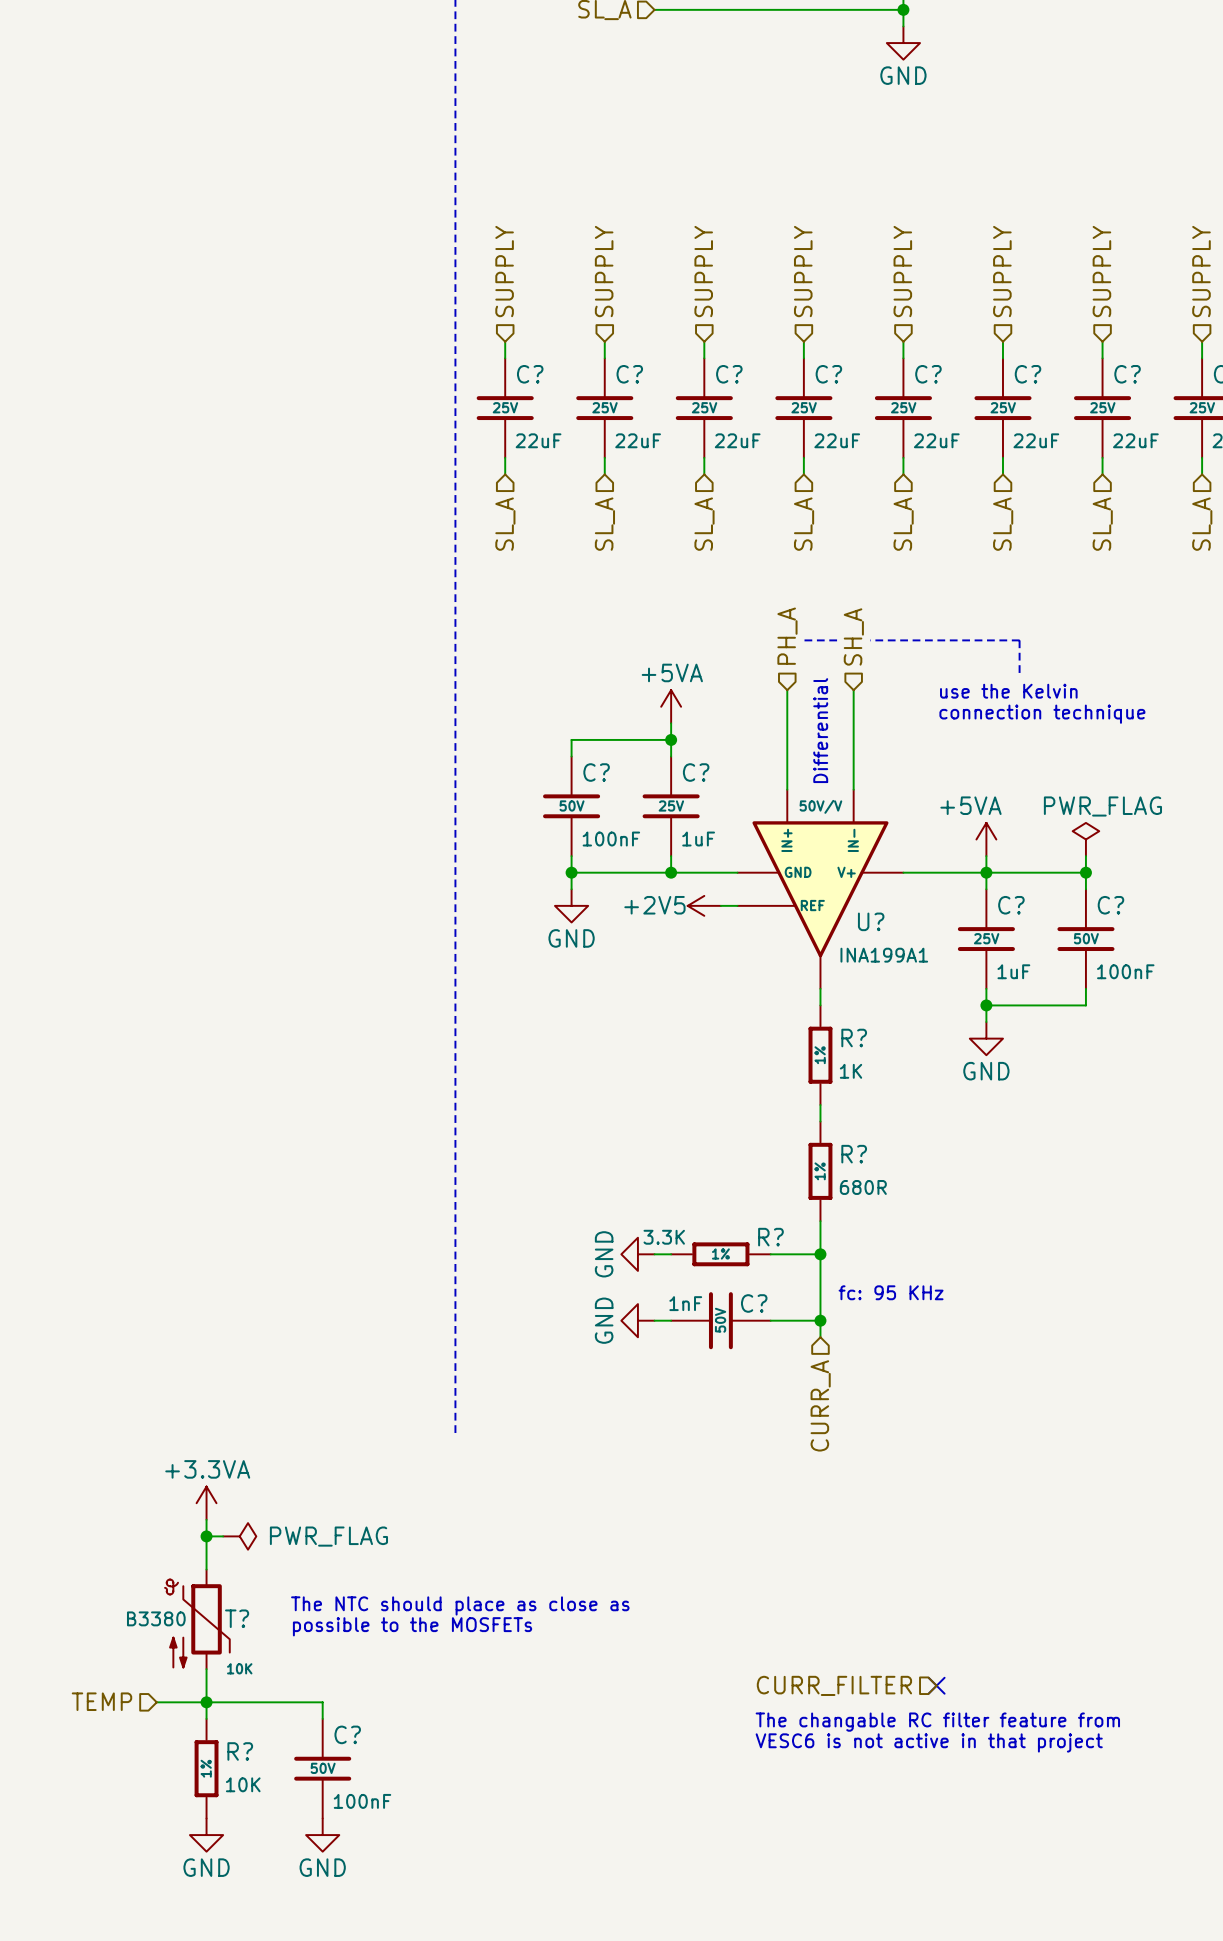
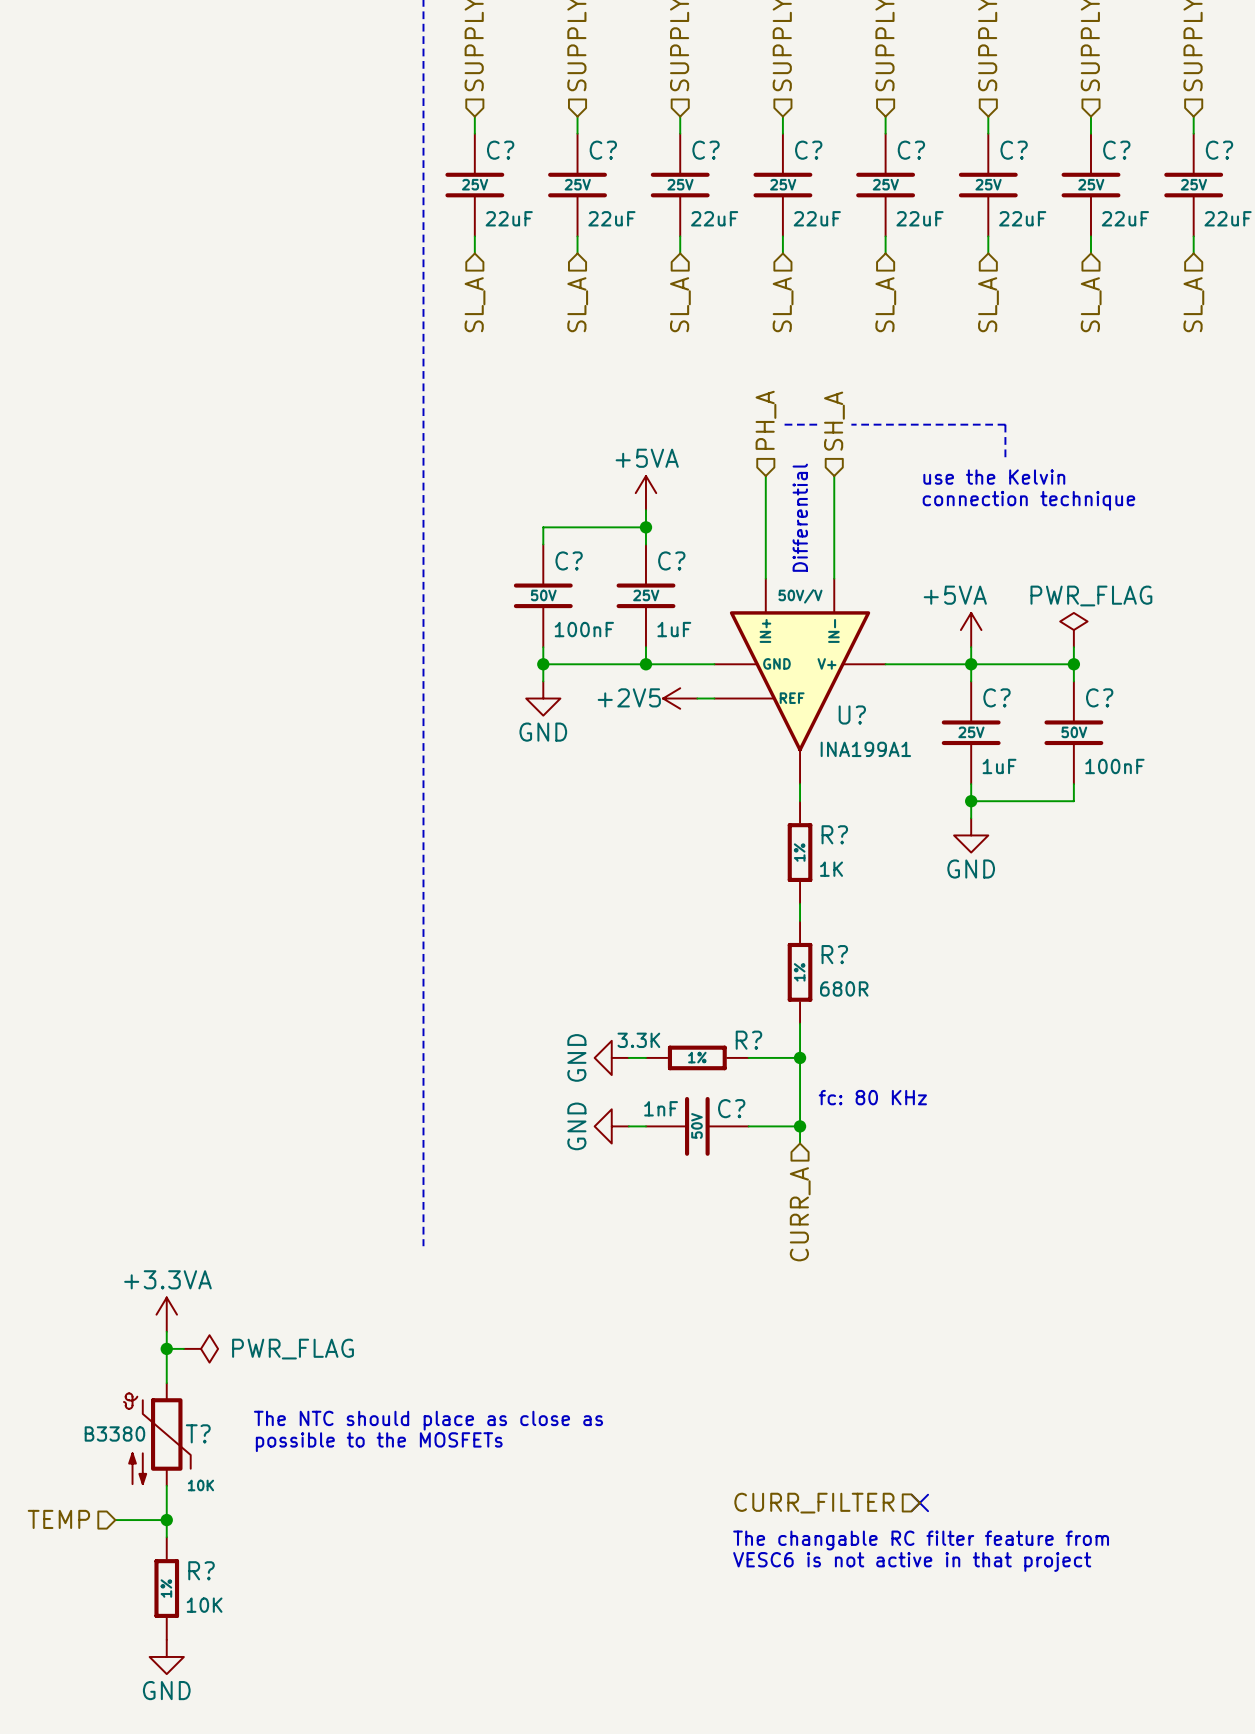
text: fc: 95 KHz (891, 1292) -> fc: 80 KHz (872, 1097)
wire: (206, 1702) (322, 1702) (322, 1718) -> none
C?: 100nF (322, 1768) -> none
power symbol: GND (322, 1835) -> none

